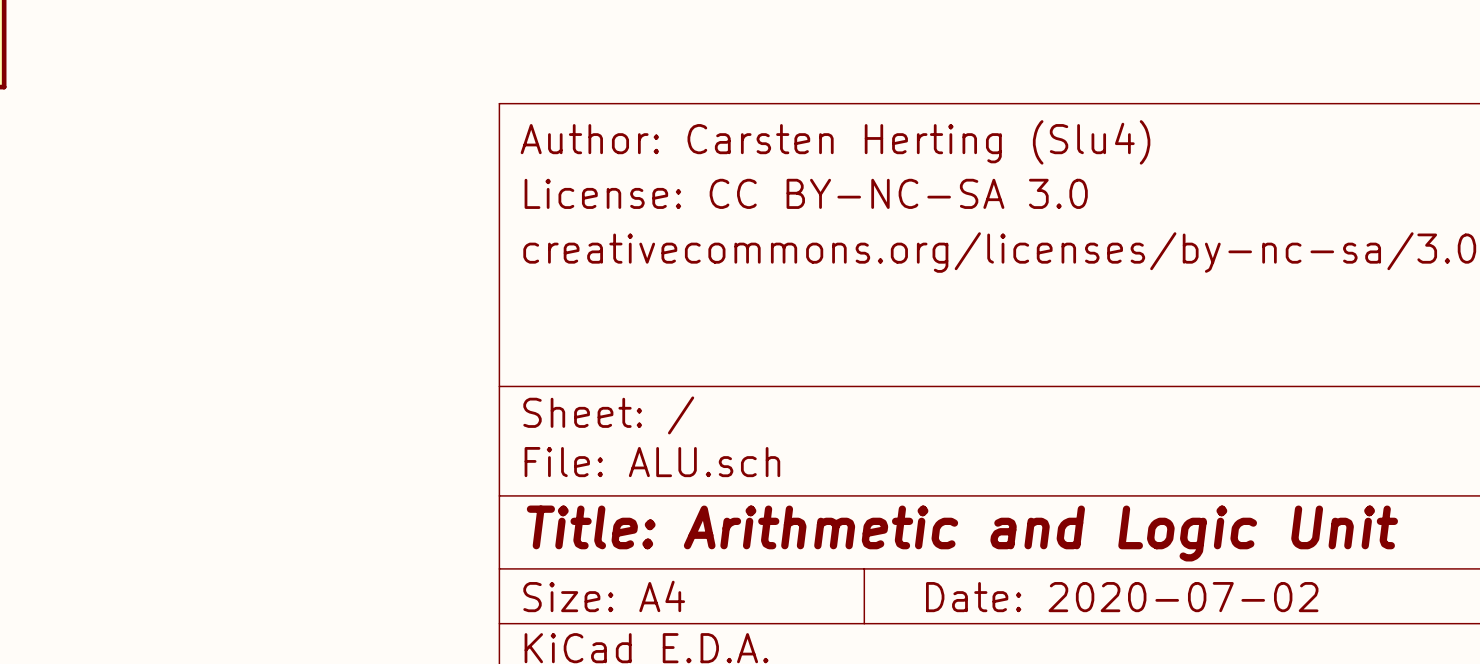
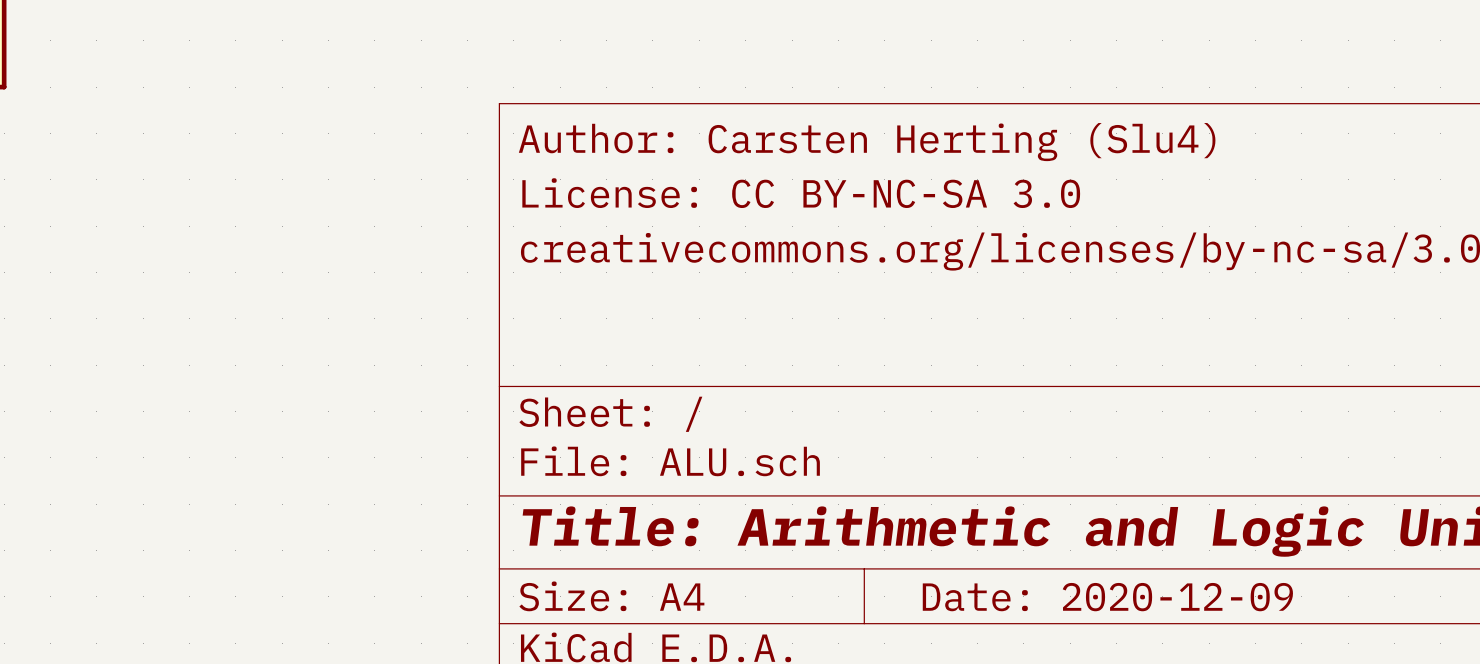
title block: Date: 2020-07-02 (1122, 597) -> Date: 2020-12-09 (1107, 597)

